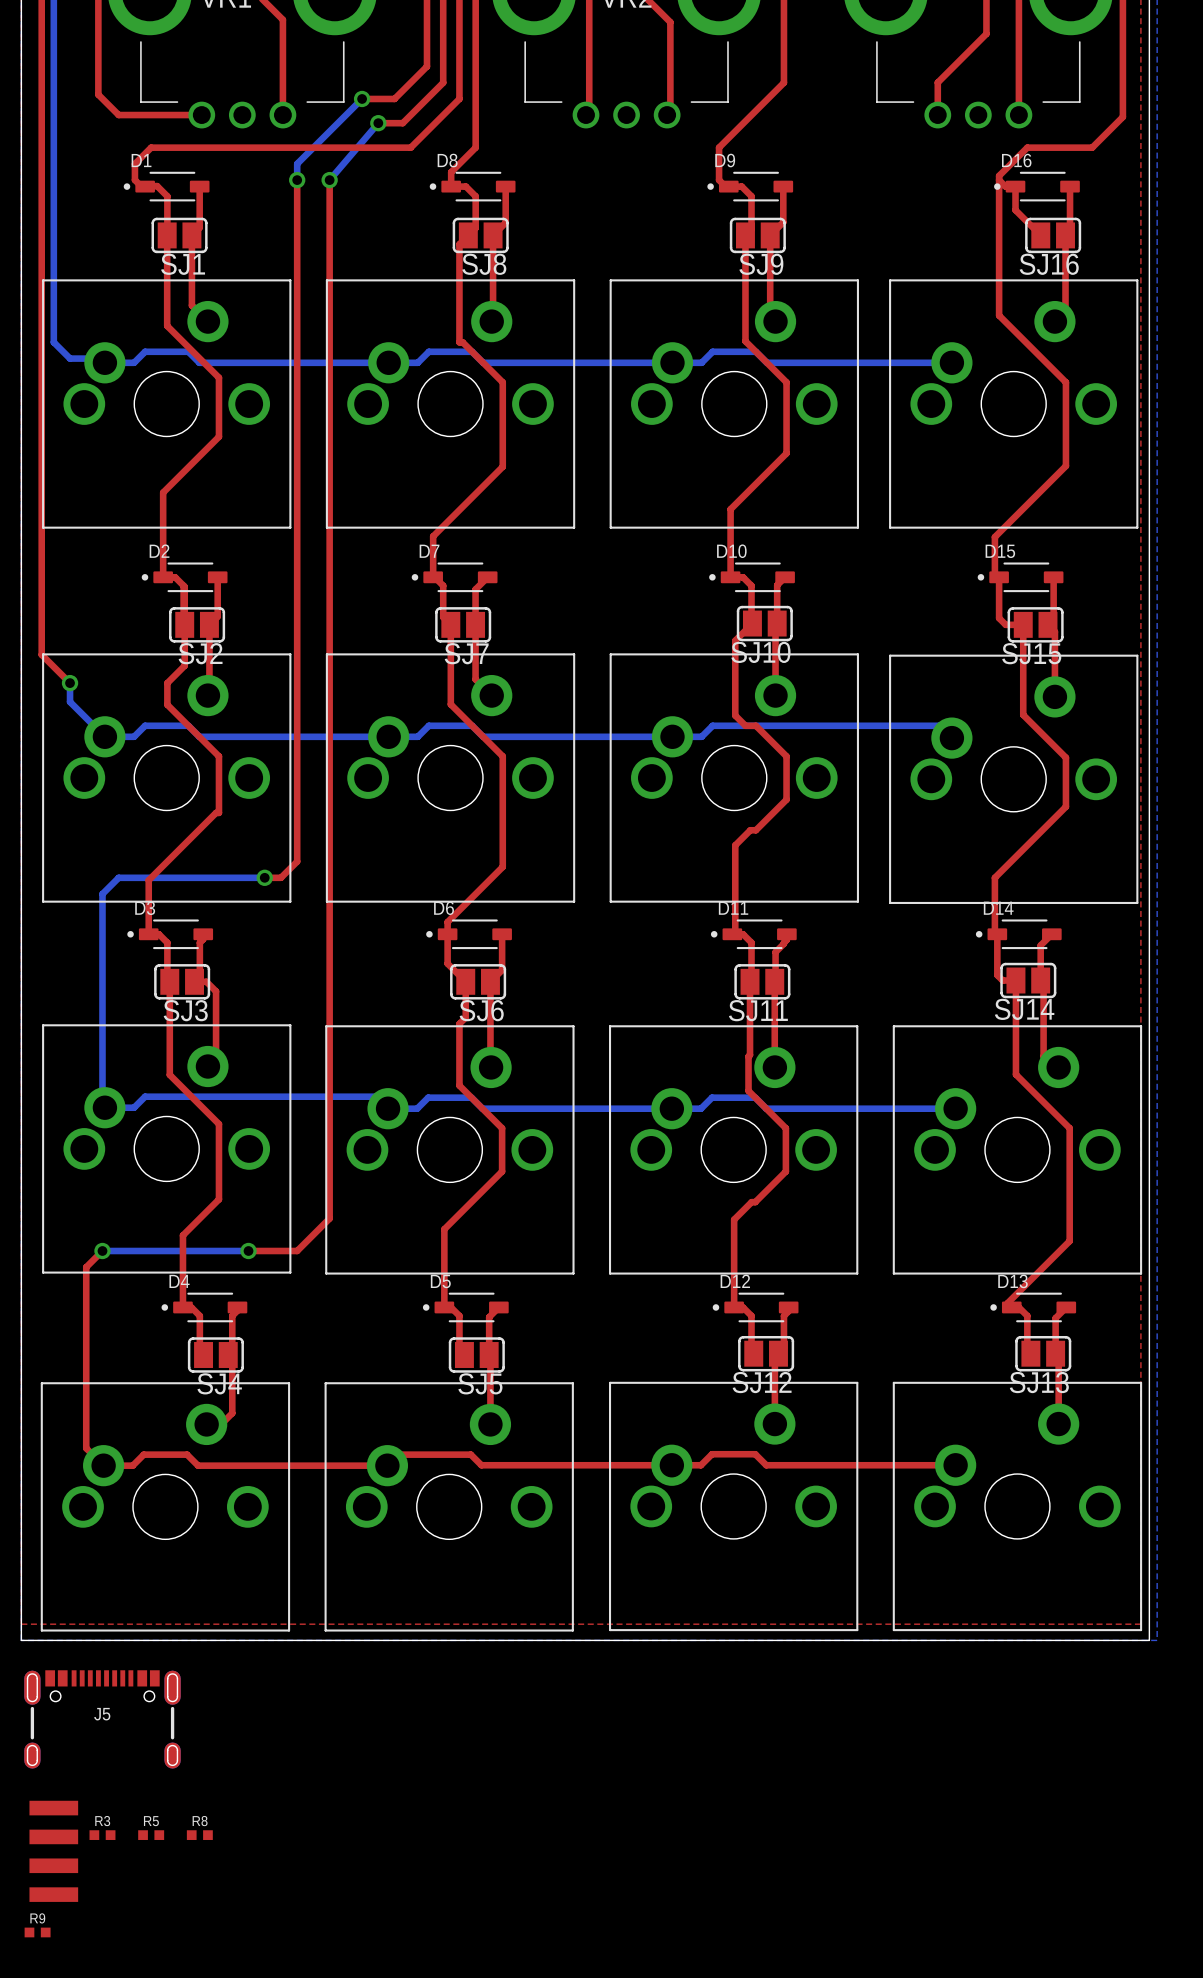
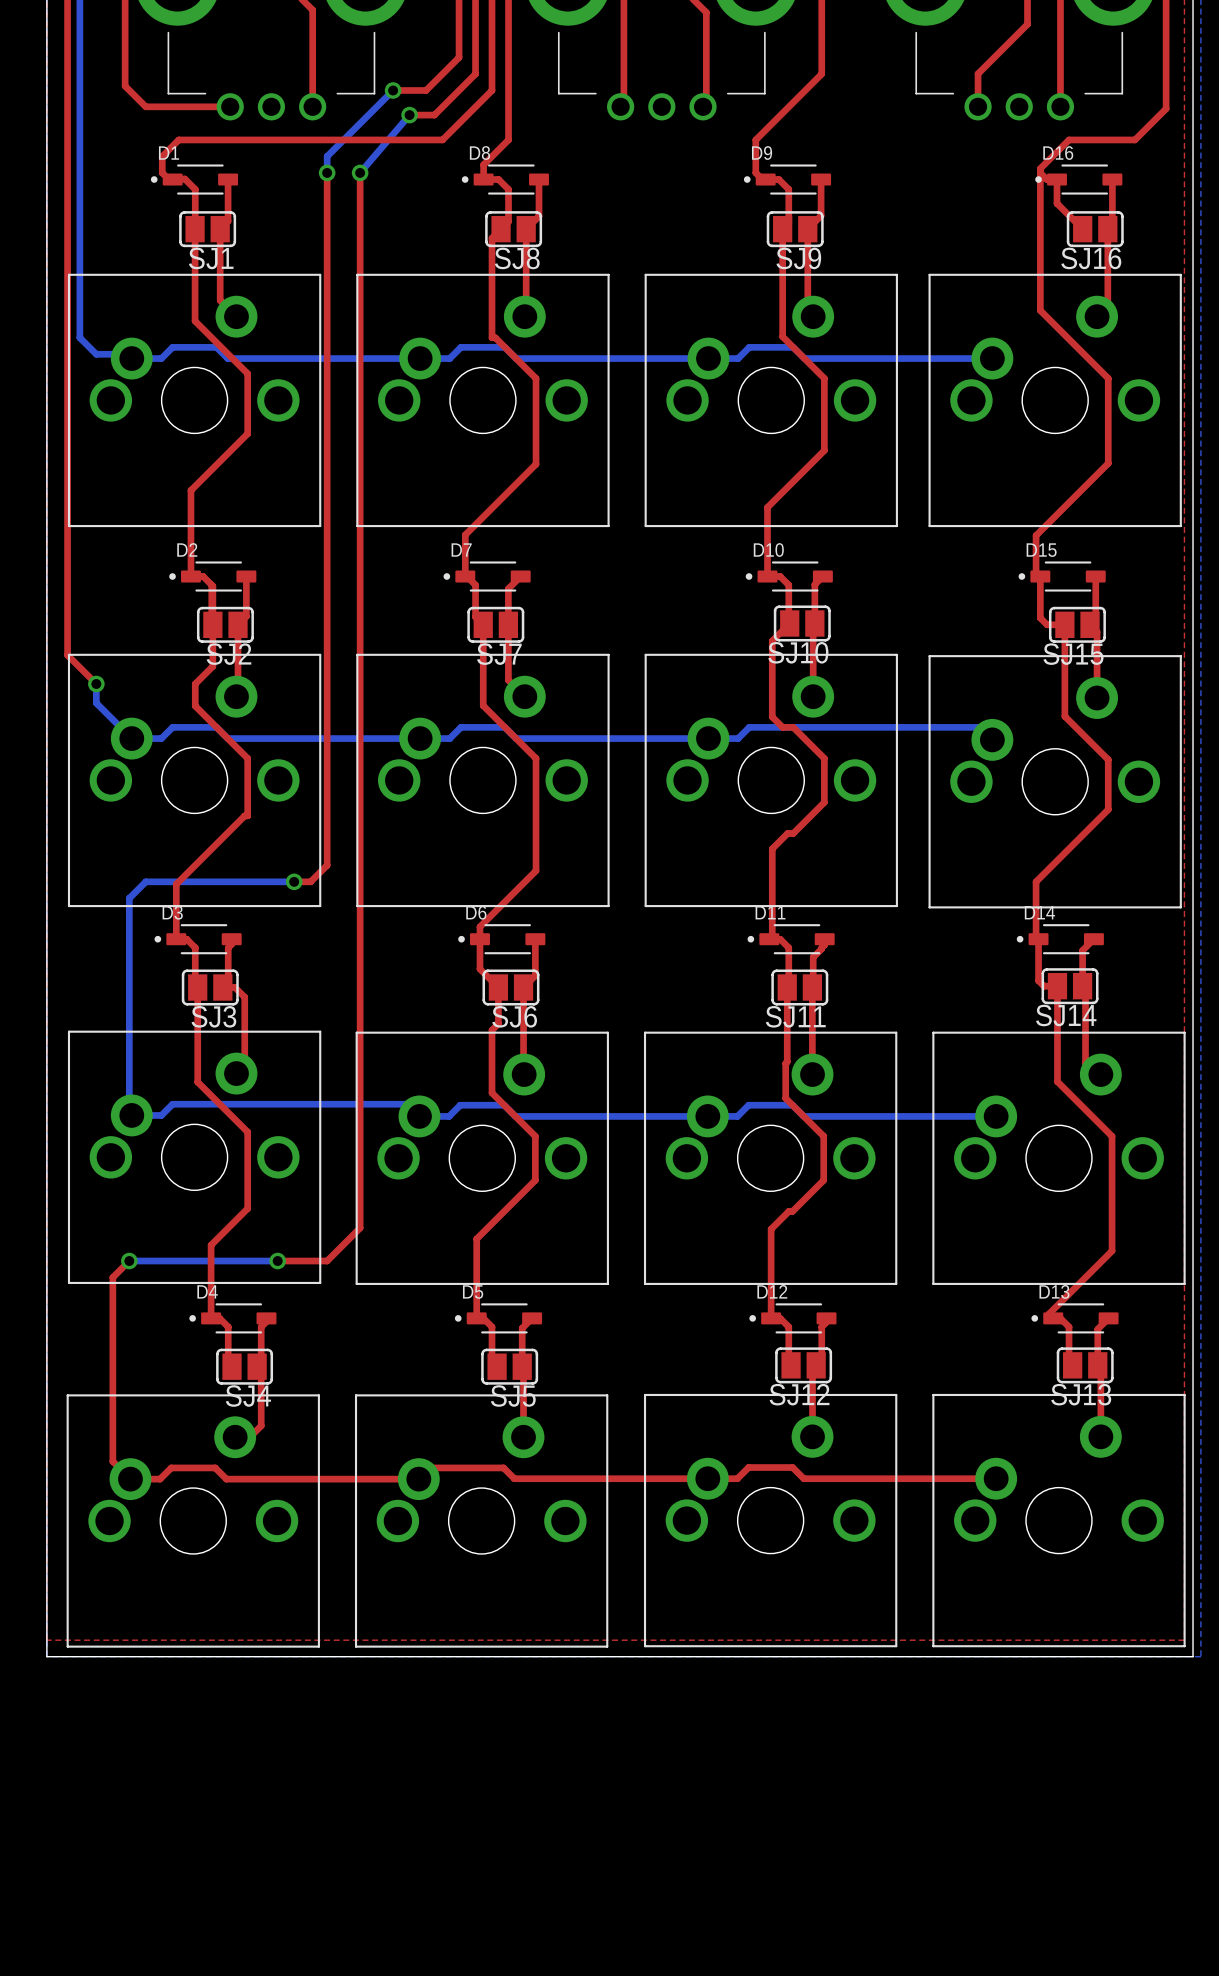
J5: (102, 1719) -> none
R3: (102, 1835) -> none
R5: (151, 1835) -> none
R8: (199, 1835) -> none
part: (53, 1851) -> none
R9: (37, 1932) -> none

